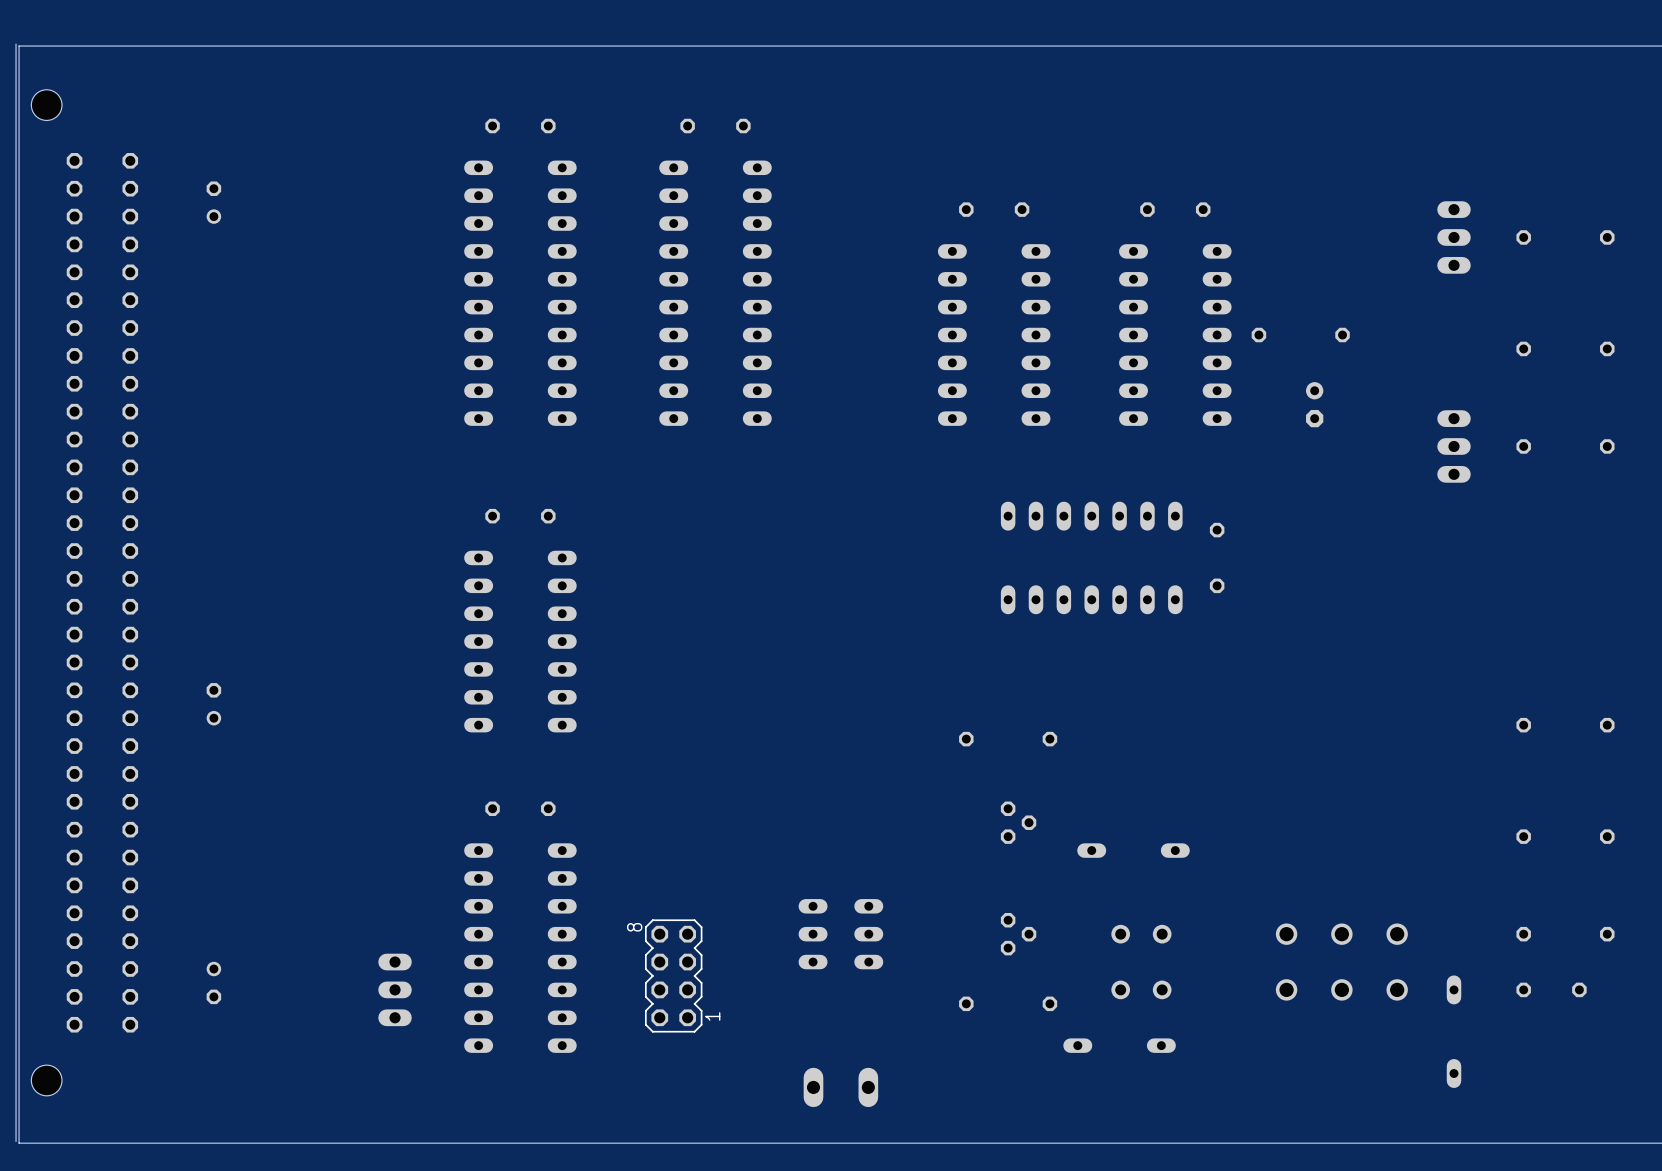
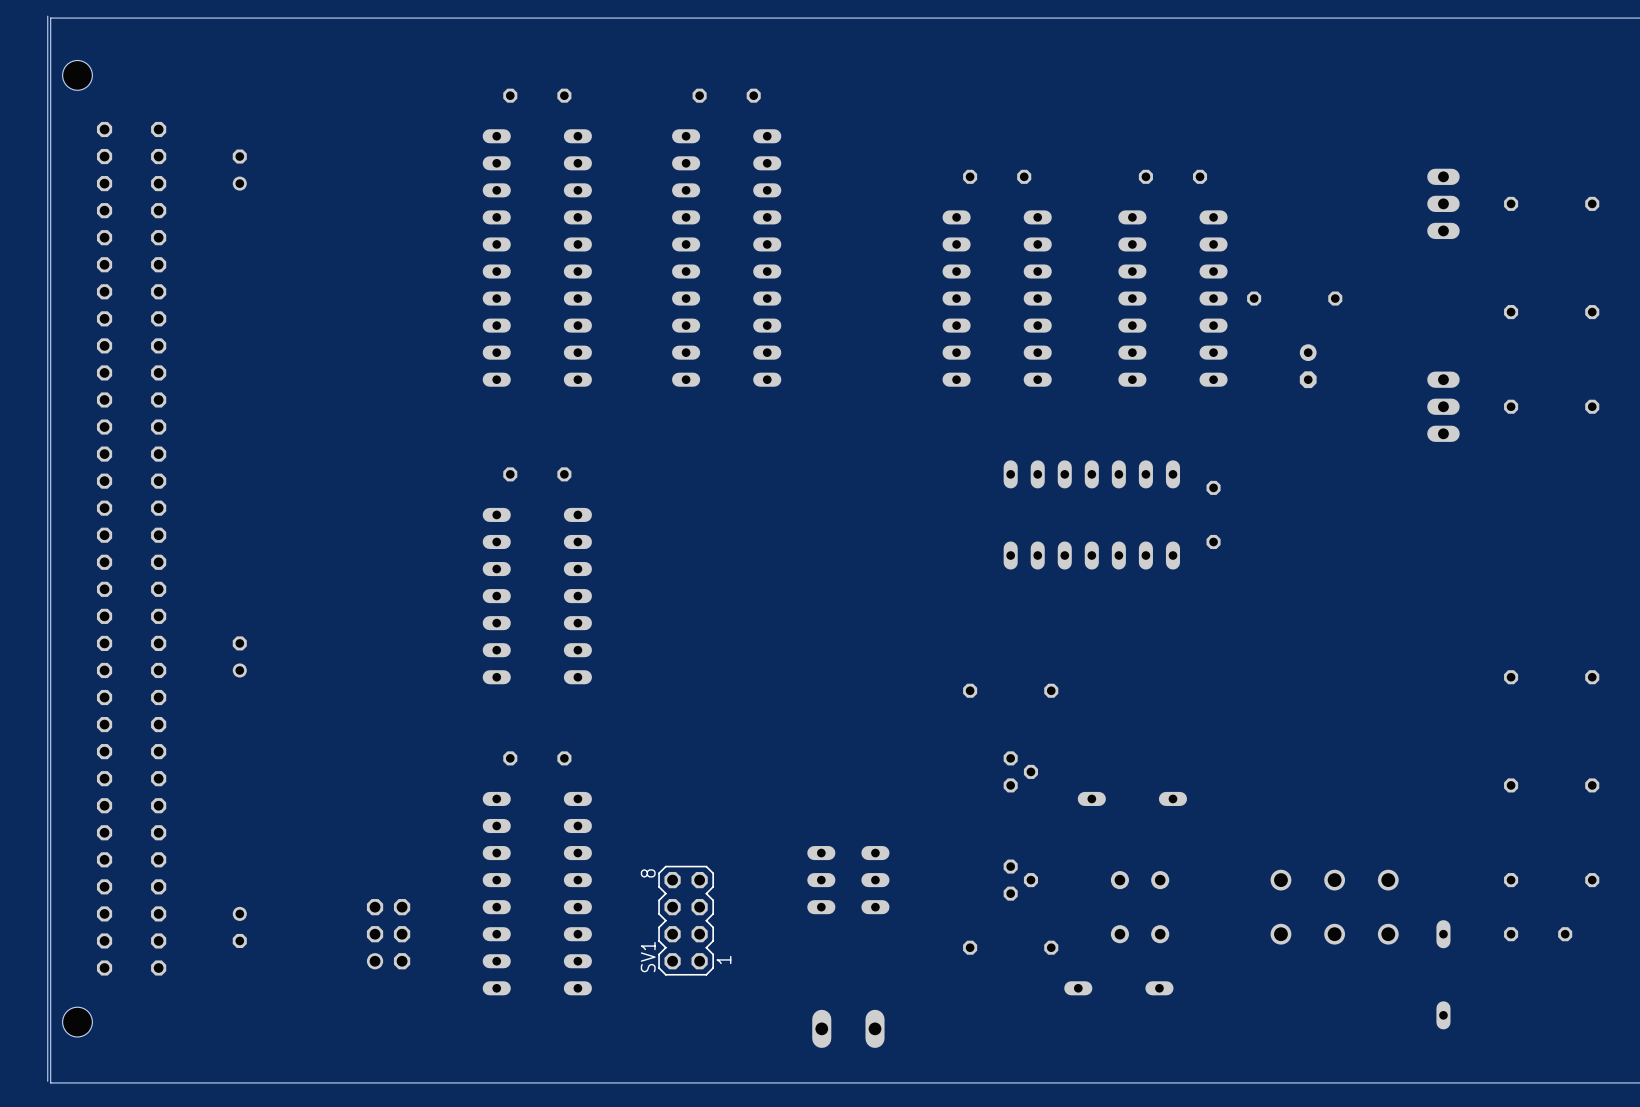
part: none -> (388, 934)
part: (395, 989) -> none
SV1 name: none -> SV1 (648, 957)

